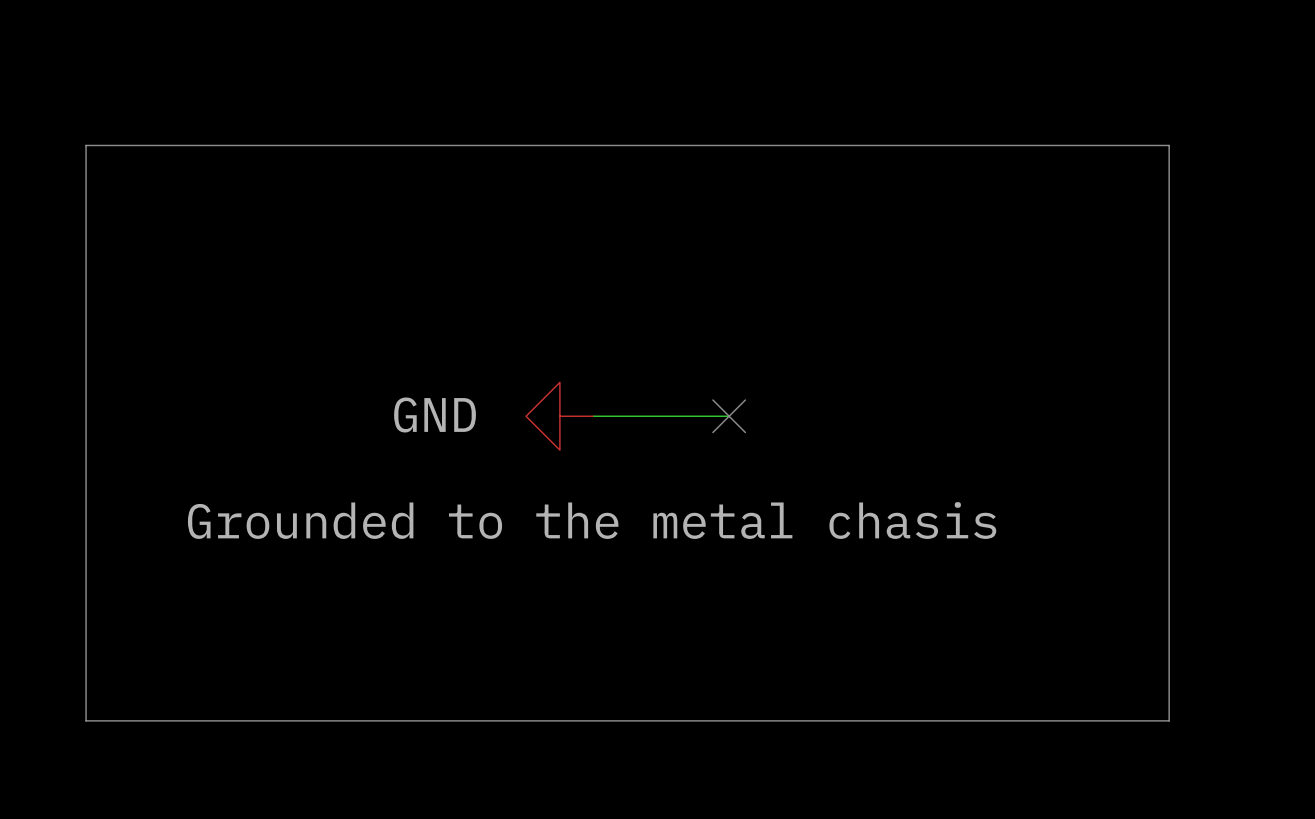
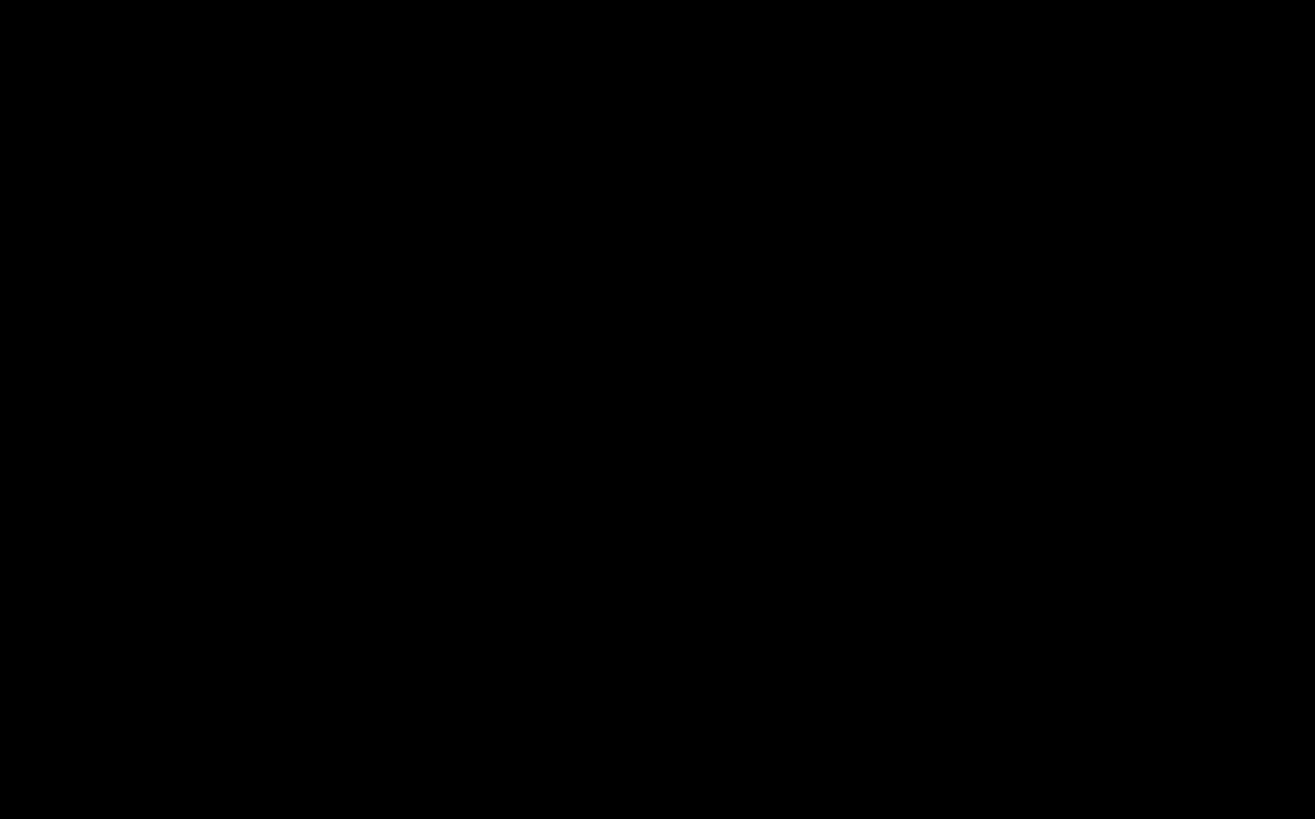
line: (86, 145) (1169, 145) (1169, 720) (86, 720) (86, 145) -> none
power symbol: GND (559, 416) -> none
wire: (593, 416) (729, 416) -> none
no-connect mark: (729, 416) -> none
label: Grounded to the metal chasis (592, 520) -> none

